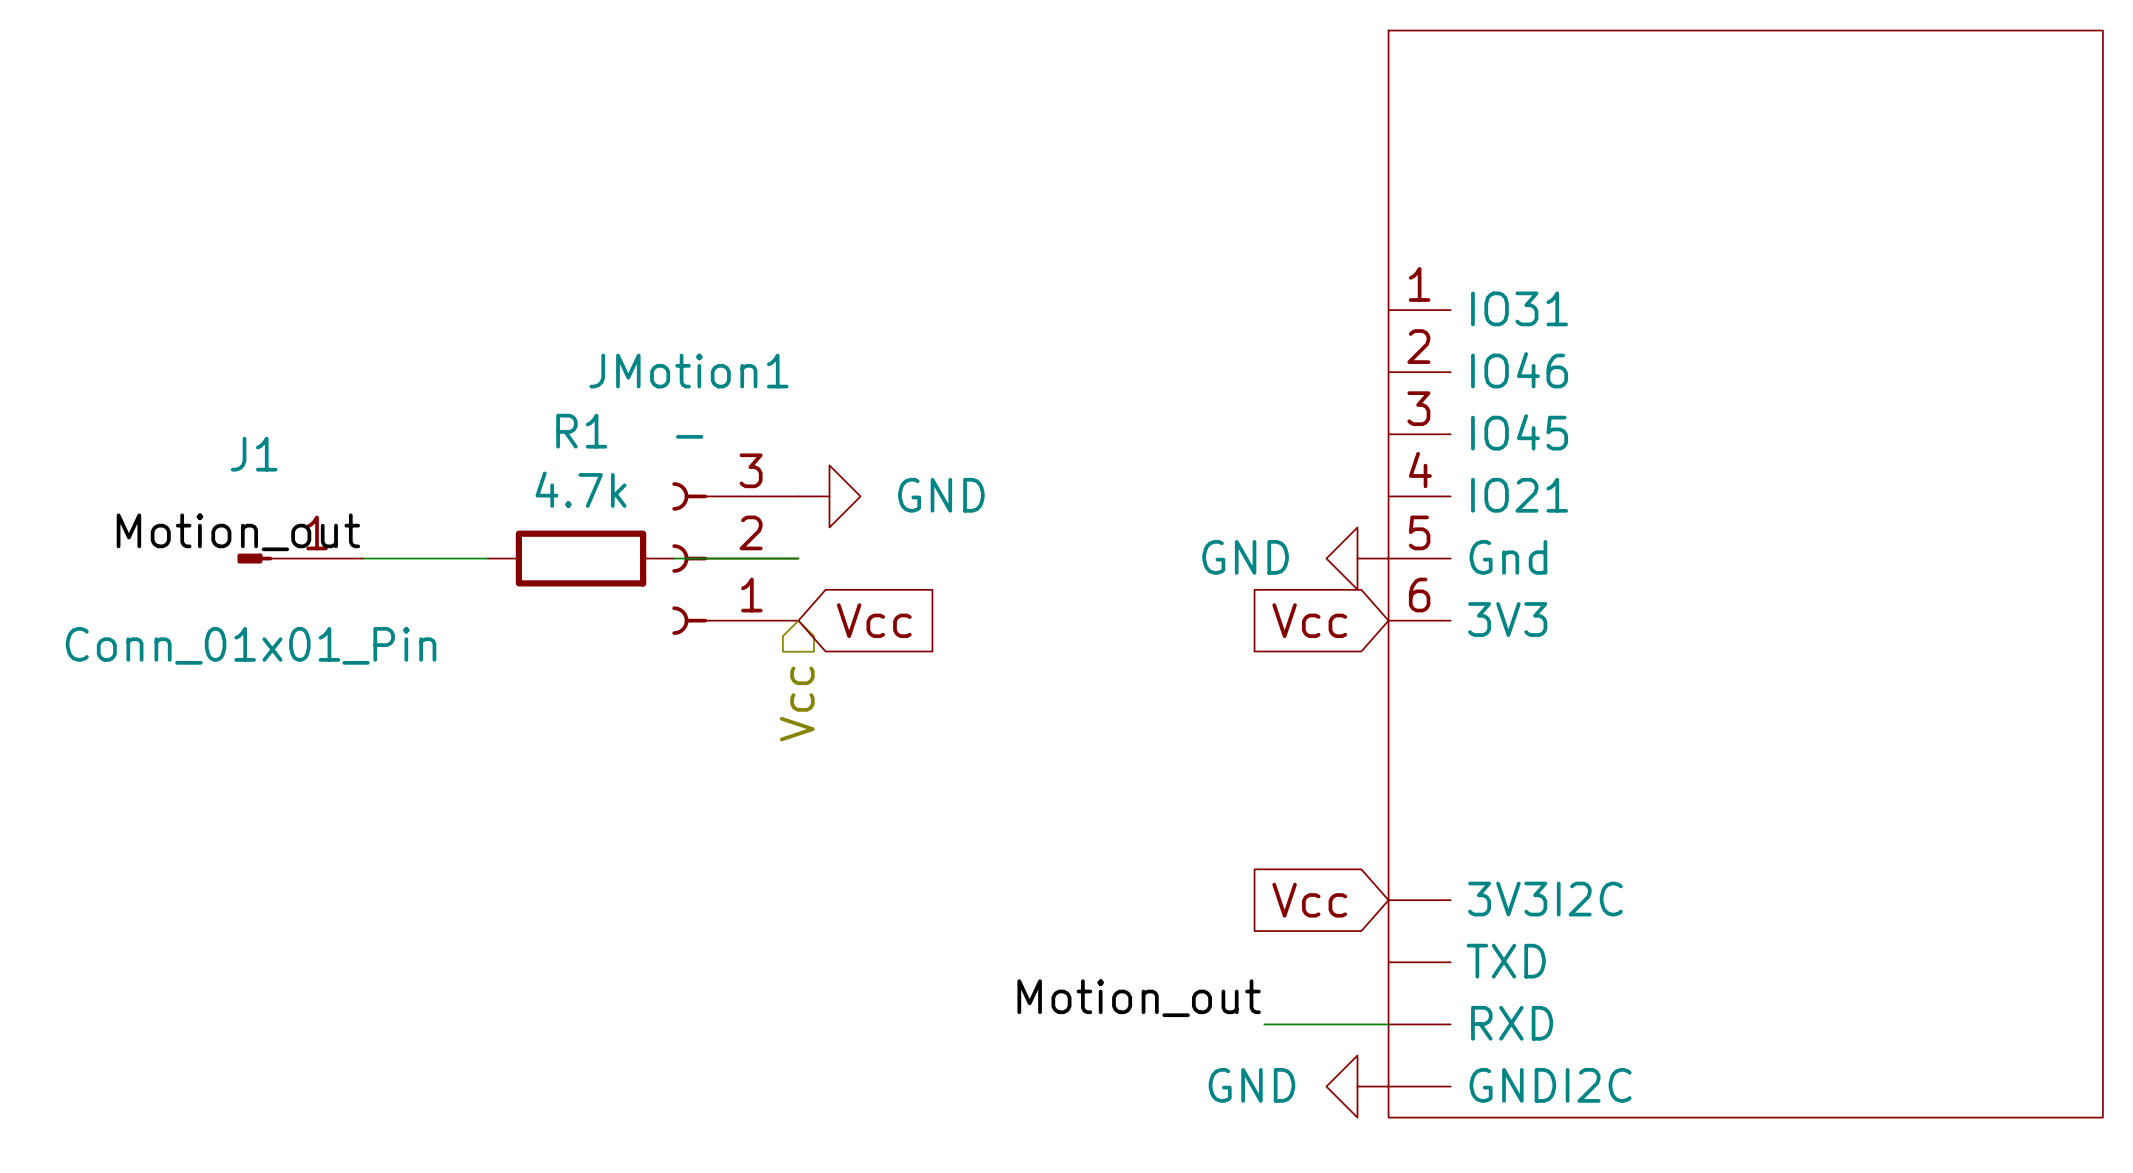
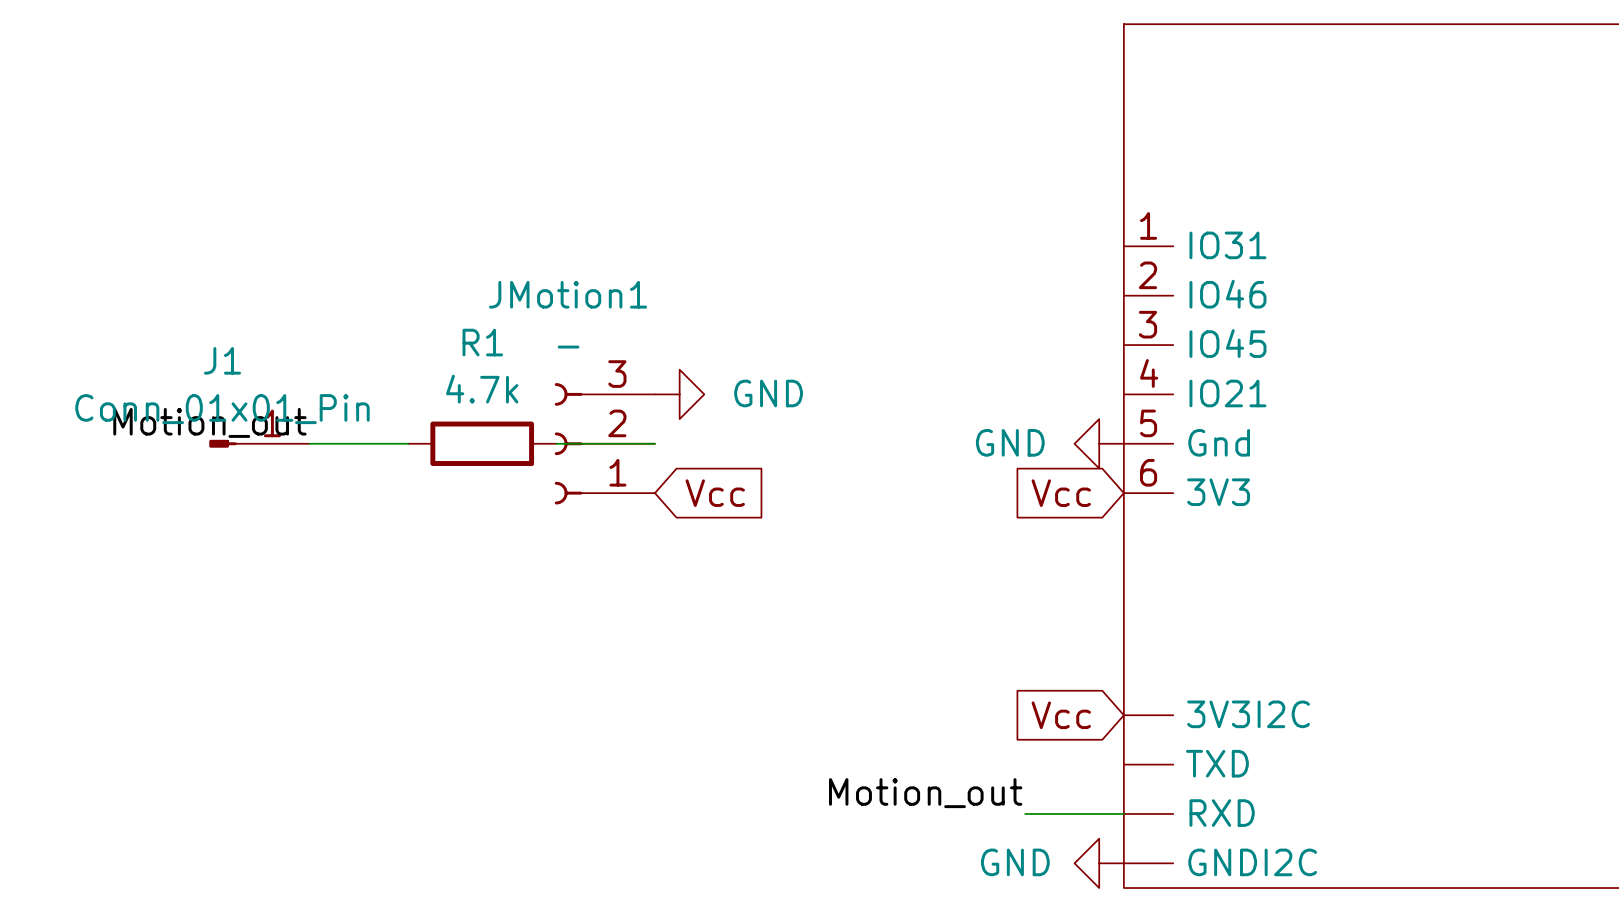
J1 value position: Conn_01x01_Pin (251, 645) -> Conn_01x01_Pin (222, 409)
hierarchical label: Vcc (797, 703) -> none

